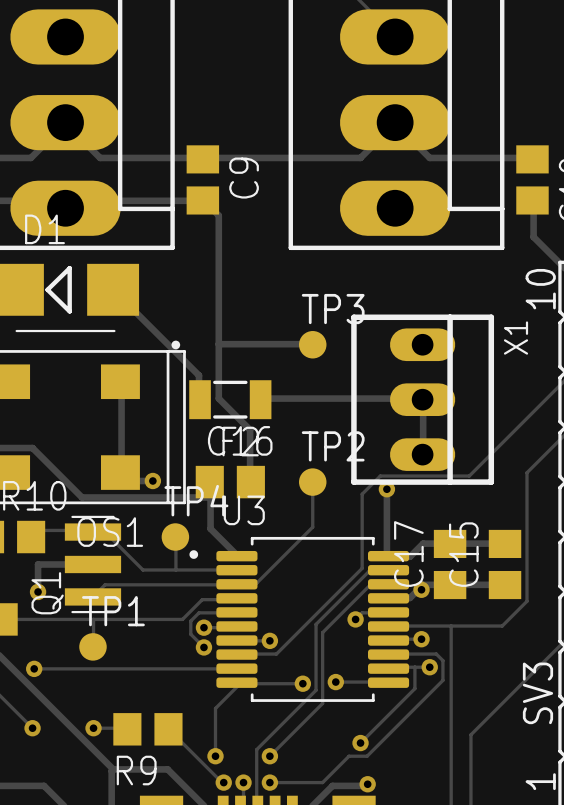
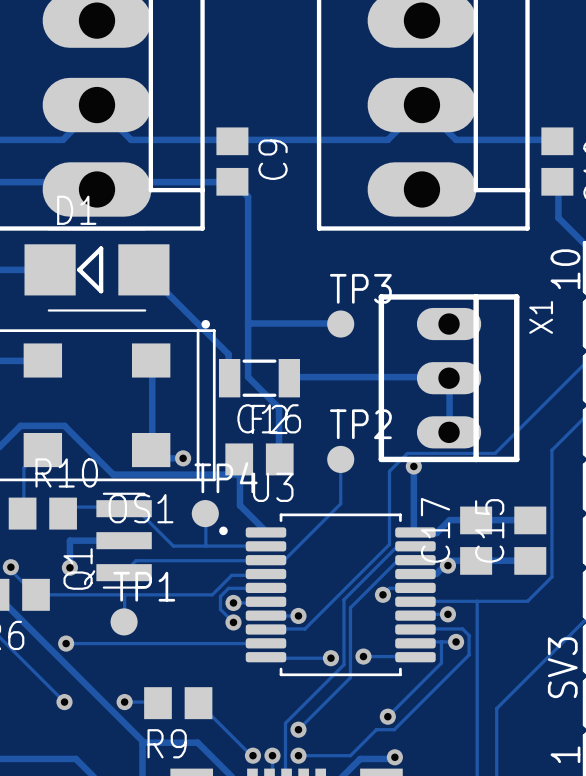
track: (236, 682) (238, 685) (215, 708) (215, 756) -> none
via: (215, 756) -> none

